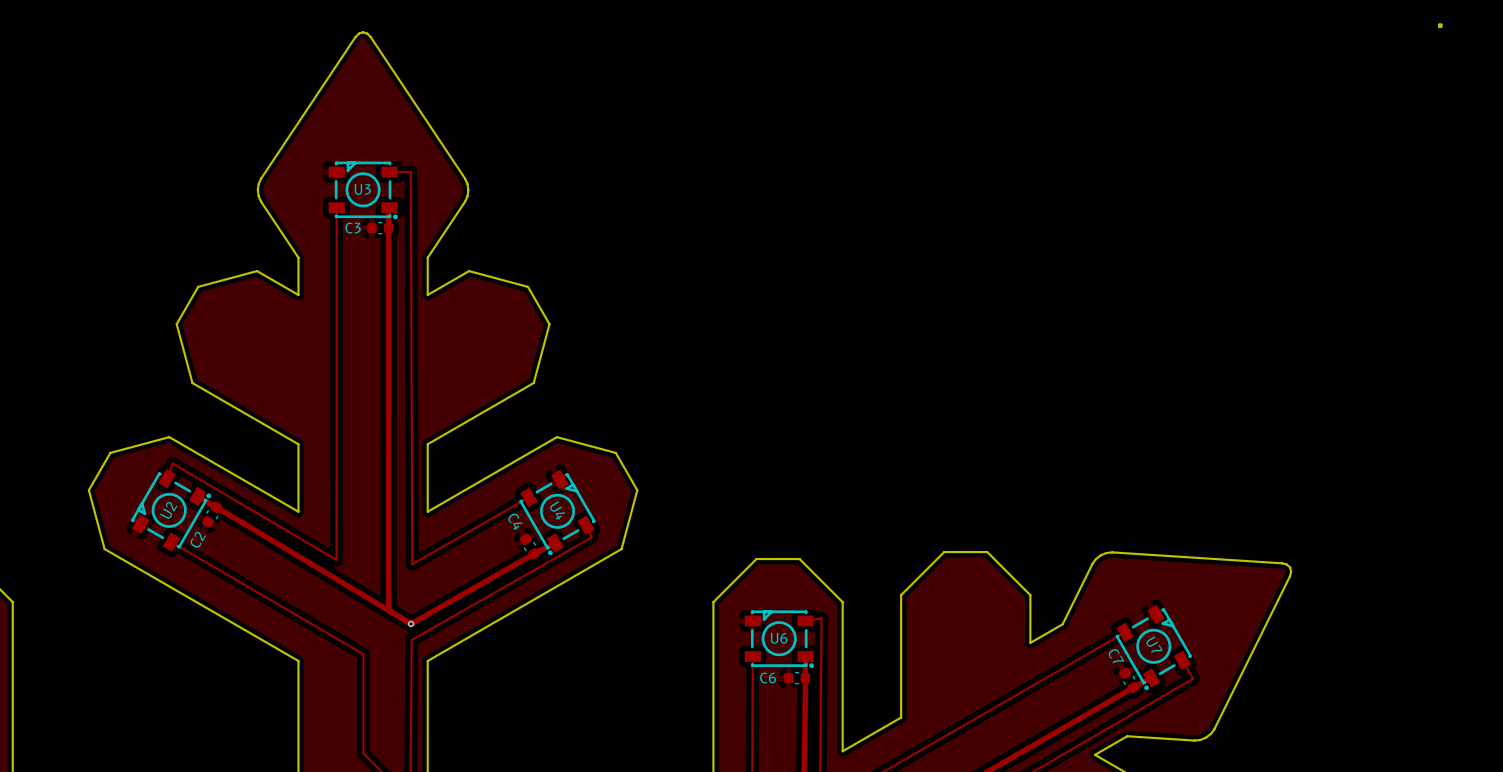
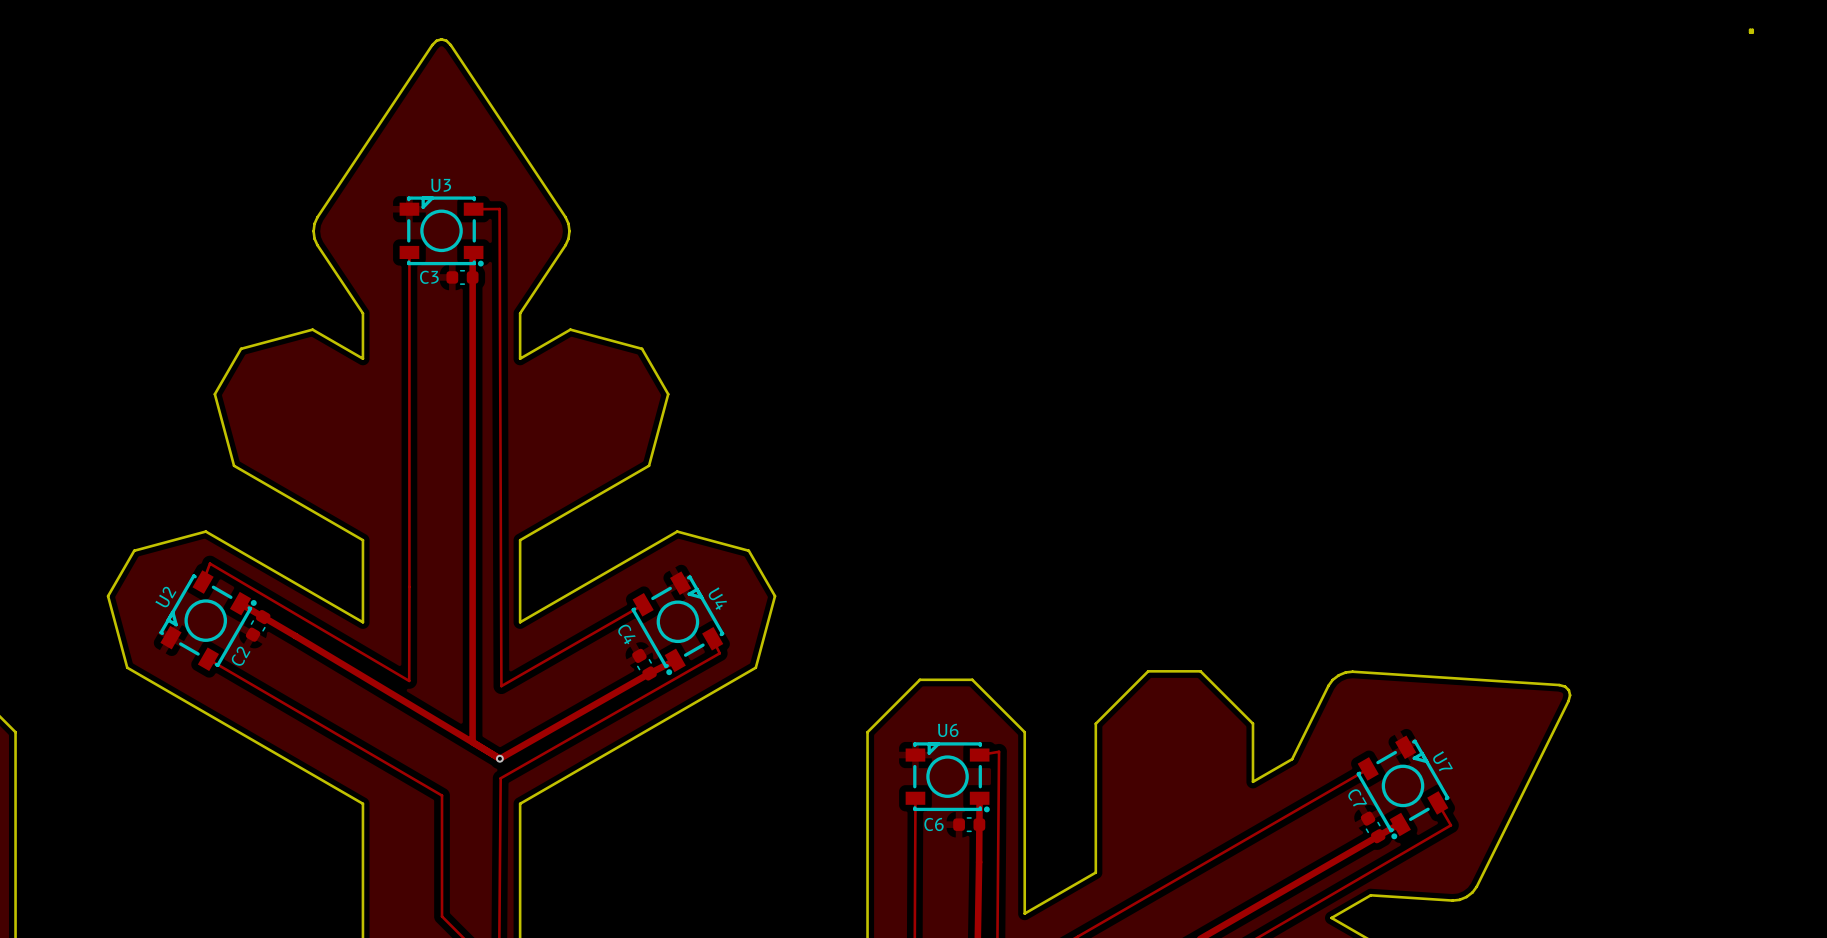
U3 name position: U3 (362, 189) -> U3 (441, 185)
U2 name position: U2 (168, 510) -> U2 (165, 597)
U4 name position: U4 (557, 510) -> U4 (717, 598)
U6 name position: U6 (779, 638) -> U6 (948, 730)
U7 name position: U7 (1154, 644) -> U7 (1443, 761)

